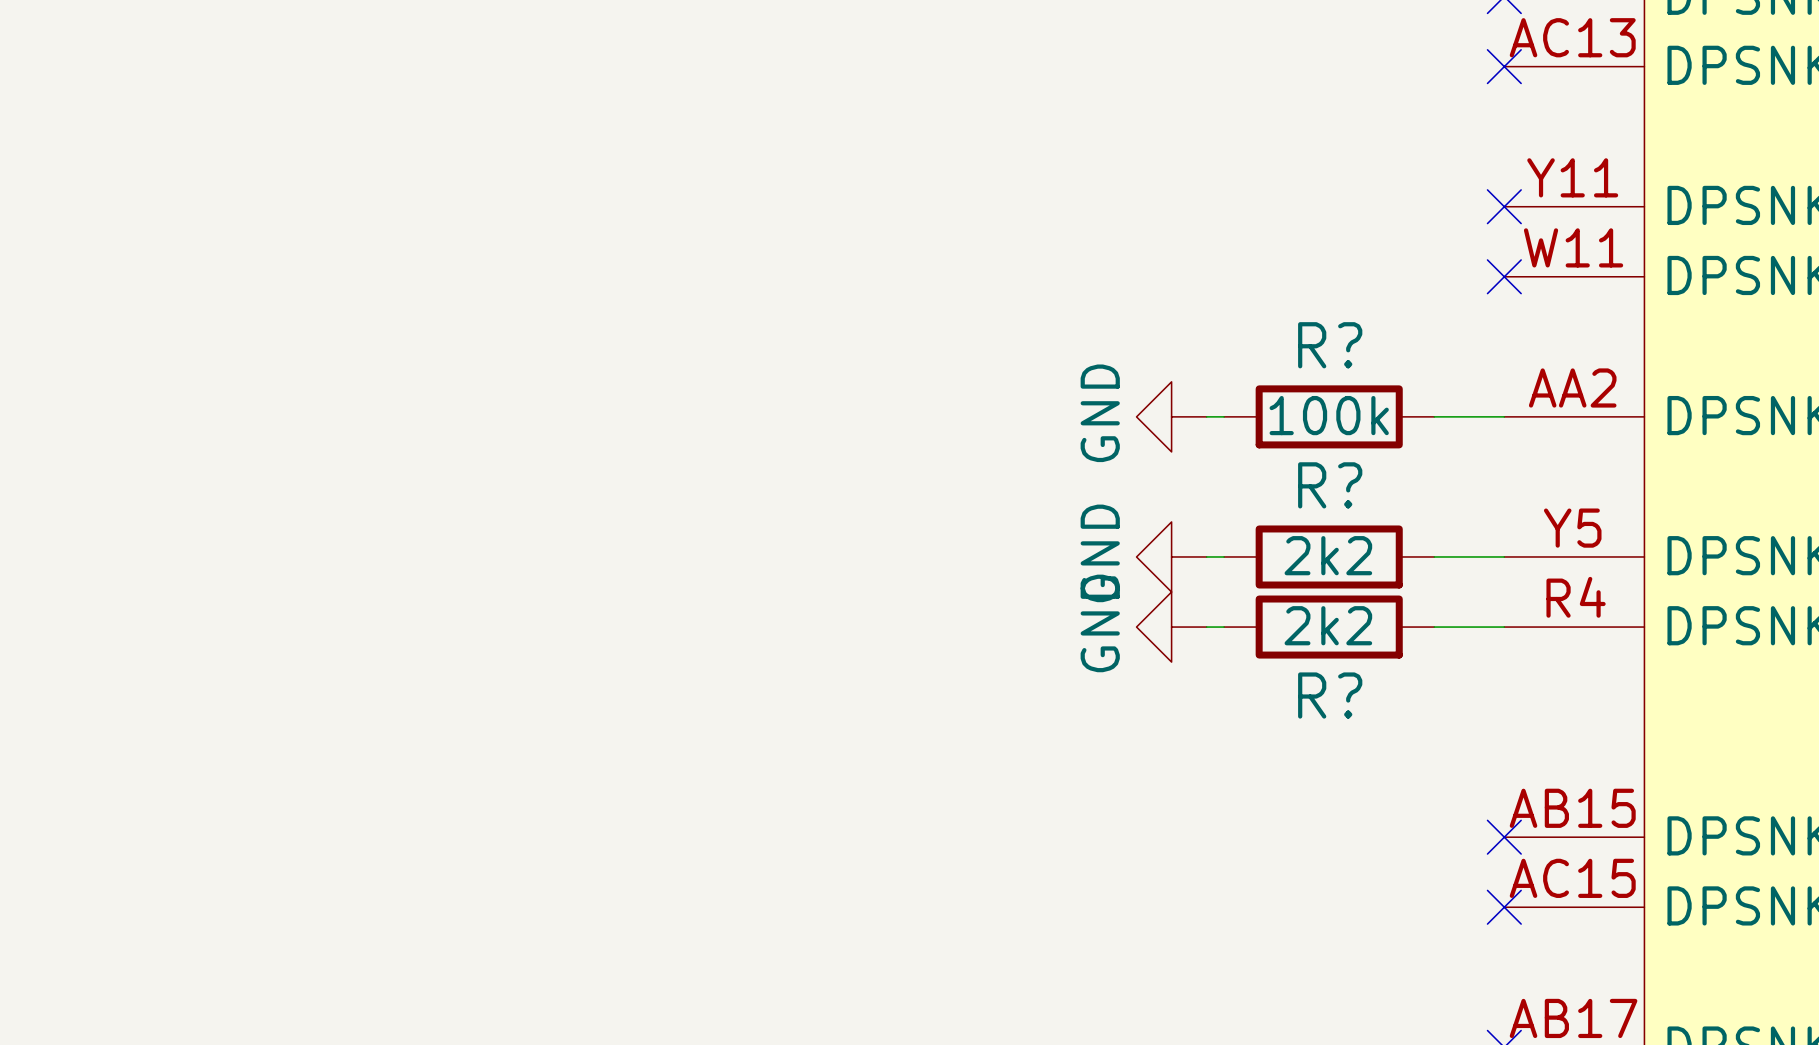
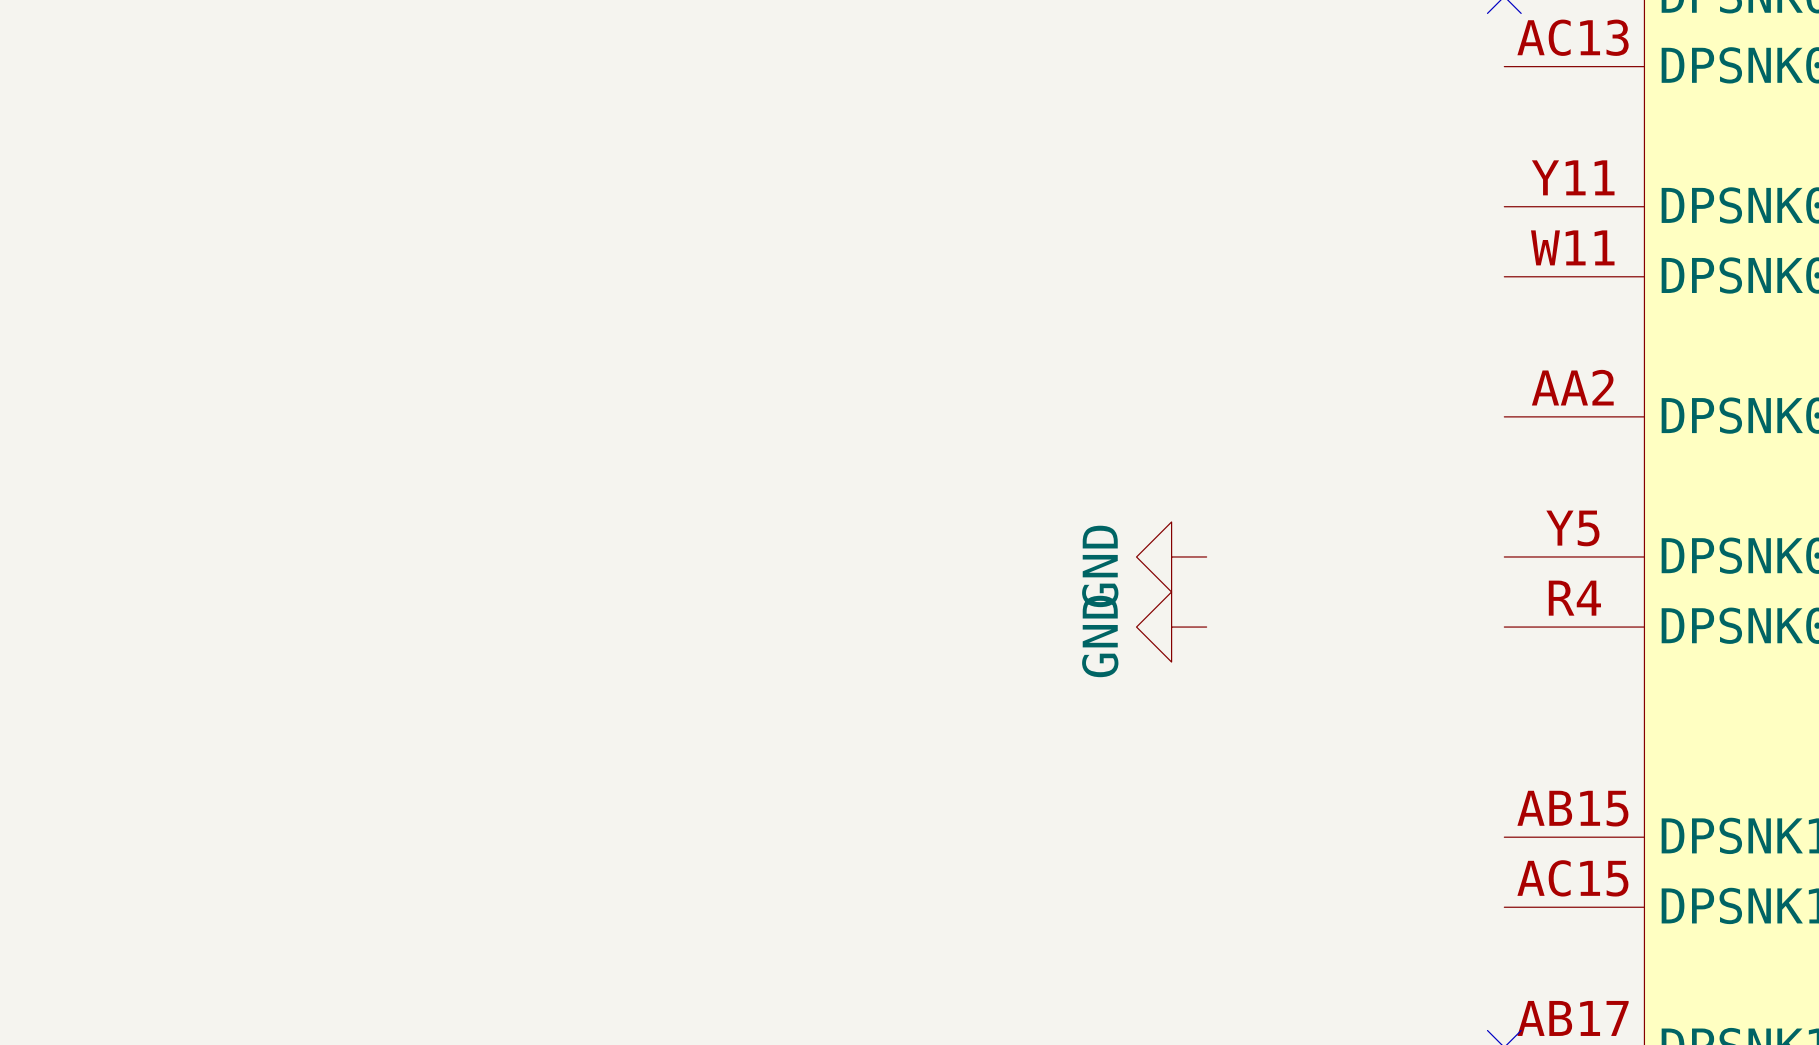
no-connect mark: (1504, 66) -> none
no-connect mark: (1504, 206) -> none
no-connect mark: (1504, 276) -> none
power symbol: GND (1171, 416) -> none
wire: (1206, 416) (1224, 416) -> none
R?: (1329, 416) -> none
wire: (1434, 416) (1504, 416) -> none
wire: (1206, 556) (1224, 556) -> none
R?: (1329, 556) -> none
wire: (1434, 556) (1504, 556) -> none
wire: (1206, 627) (1224, 627) -> none
R?: (1329, 627) -> none
wire: (1434, 627) (1504, 627) -> none
no-connect mark: (1504, 837) -> none
no-connect mark: (1504, 907) -> none

